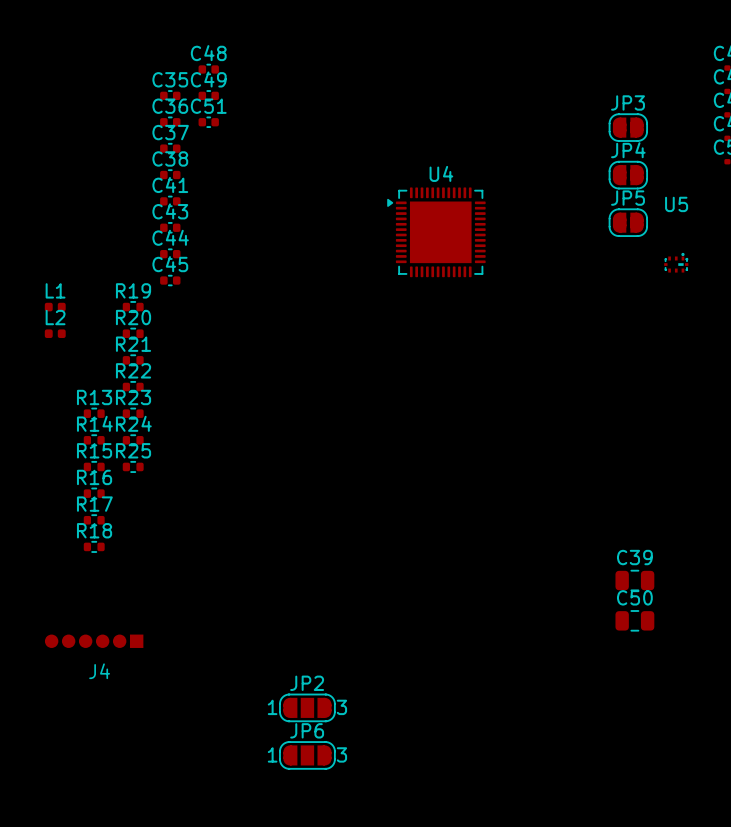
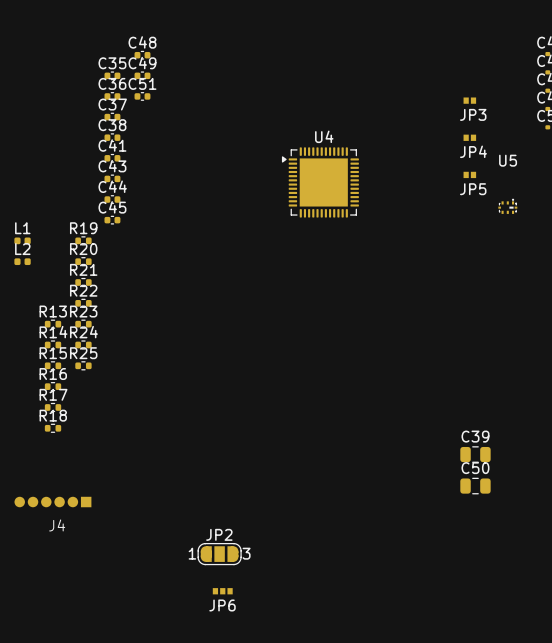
JP3 name position: JP3 (628, 102) -> JP3 (473, 114)
JP3 footprint: [608, 113, 648, 142] -> [463, 97, 477, 104]
JP4 name position: JP4 (628, 150) -> JP4 (473, 151)
JP4 footprint: [608, 160, 648, 190] -> [463, 134, 477, 141]
JP5 name position: JP5 (628, 198) -> JP5 (473, 189)
JP5 footprint: [608, 208, 648, 237] -> [463, 171, 477, 179]
JP6 name position: JP6 (307, 730) -> JP6 (222, 605)
JP6 footprint: [279, 741, 336, 770] -> [212, 588, 233, 595]

